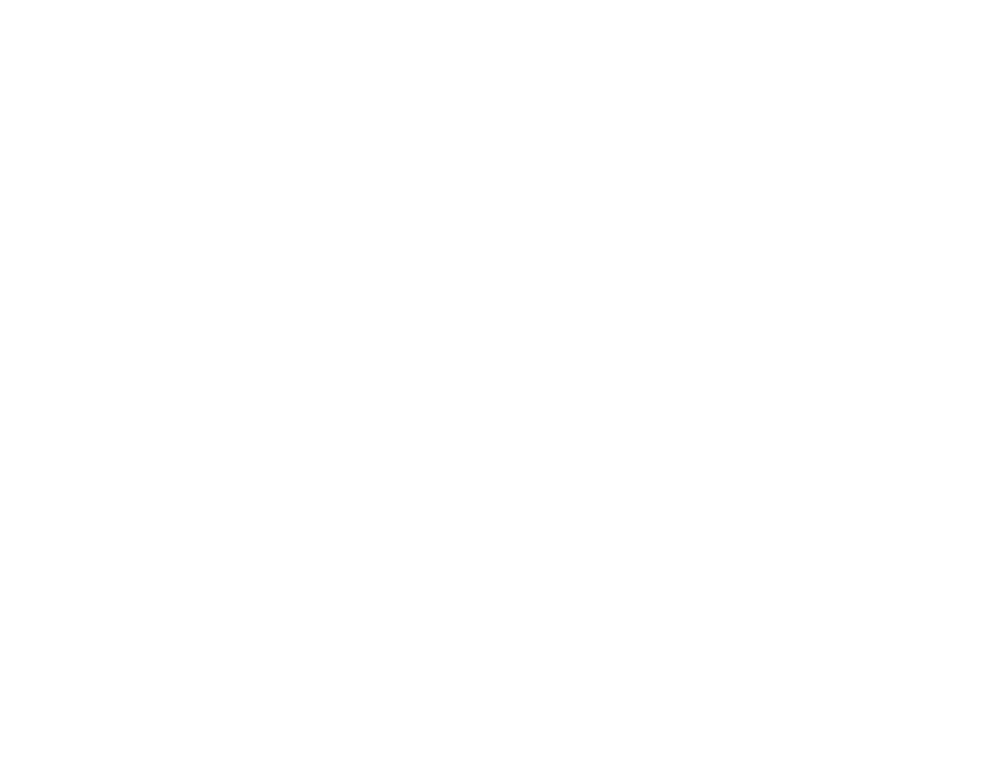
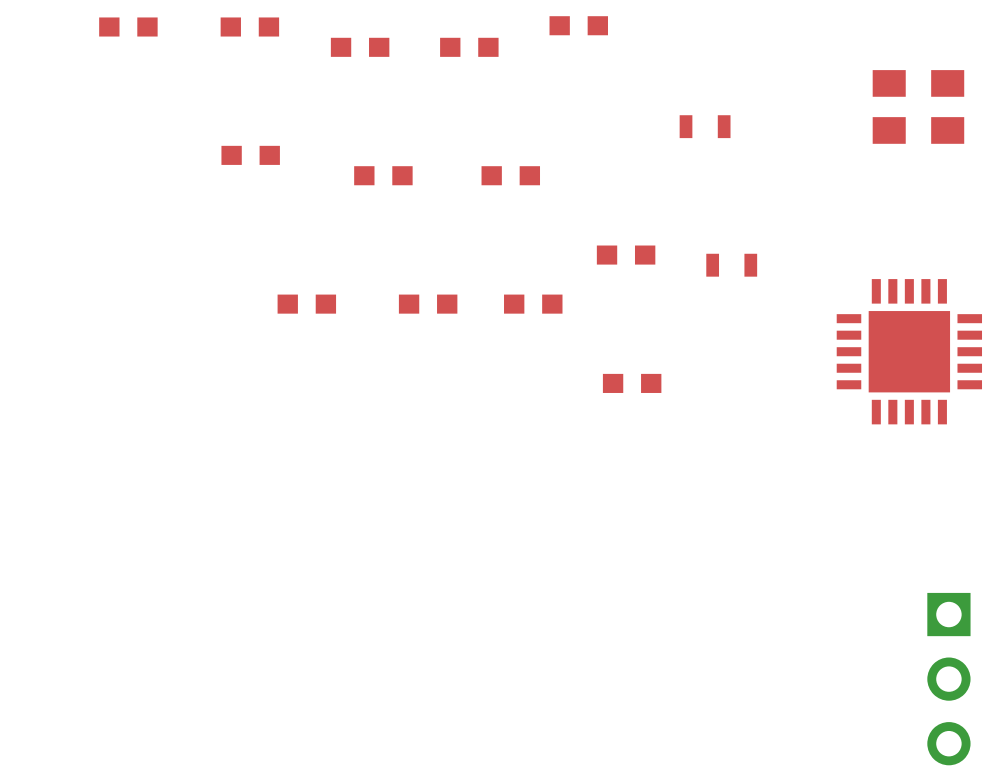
part: none -> (578, 25)
part: none -> (128, 26)
part: none -> (249, 26)
part: none -> (360, 47)
part: none -> (469, 47)
part: none -> (918, 106)
part: none -> (705, 126)
part: none -> (250, 155)
part: none -> (383, 175)
part: none -> (510, 175)
part: none -> (626, 255)
part: none -> (731, 265)
part: none -> (306, 304)
part: none -> (428, 304)
part: none -> (533, 304)
part: none -> (909, 351)
part: none -> (632, 383)
part: none -> (948, 679)

